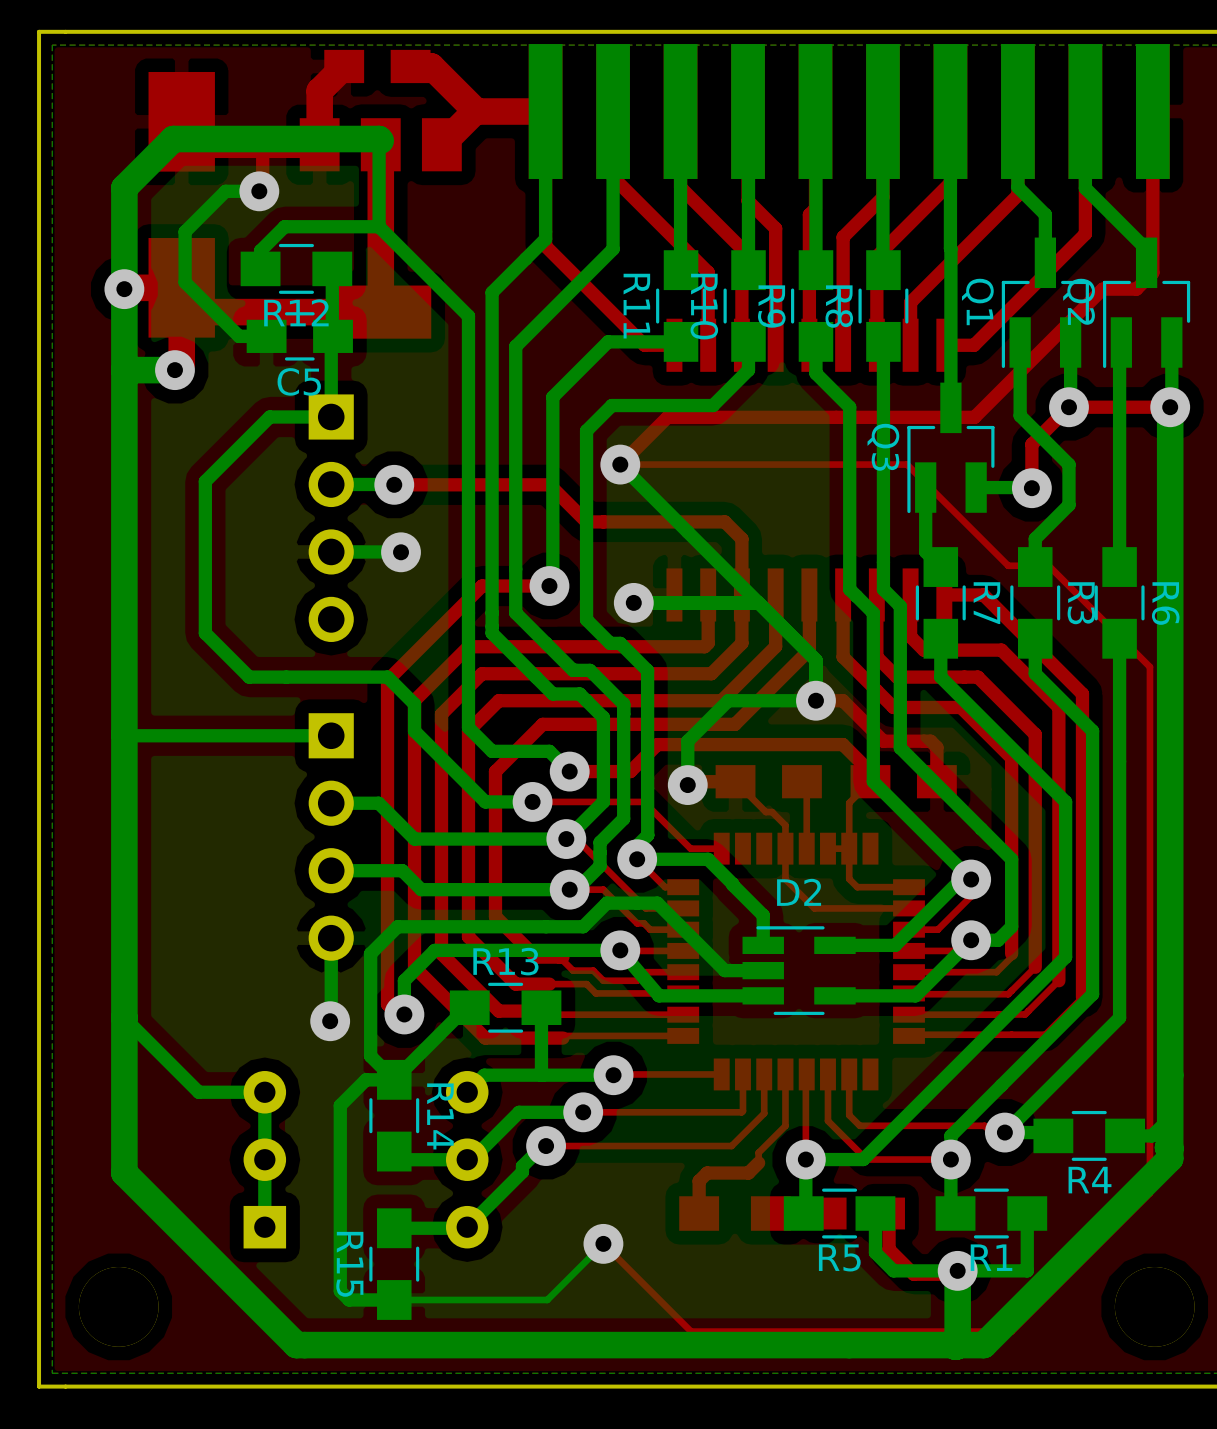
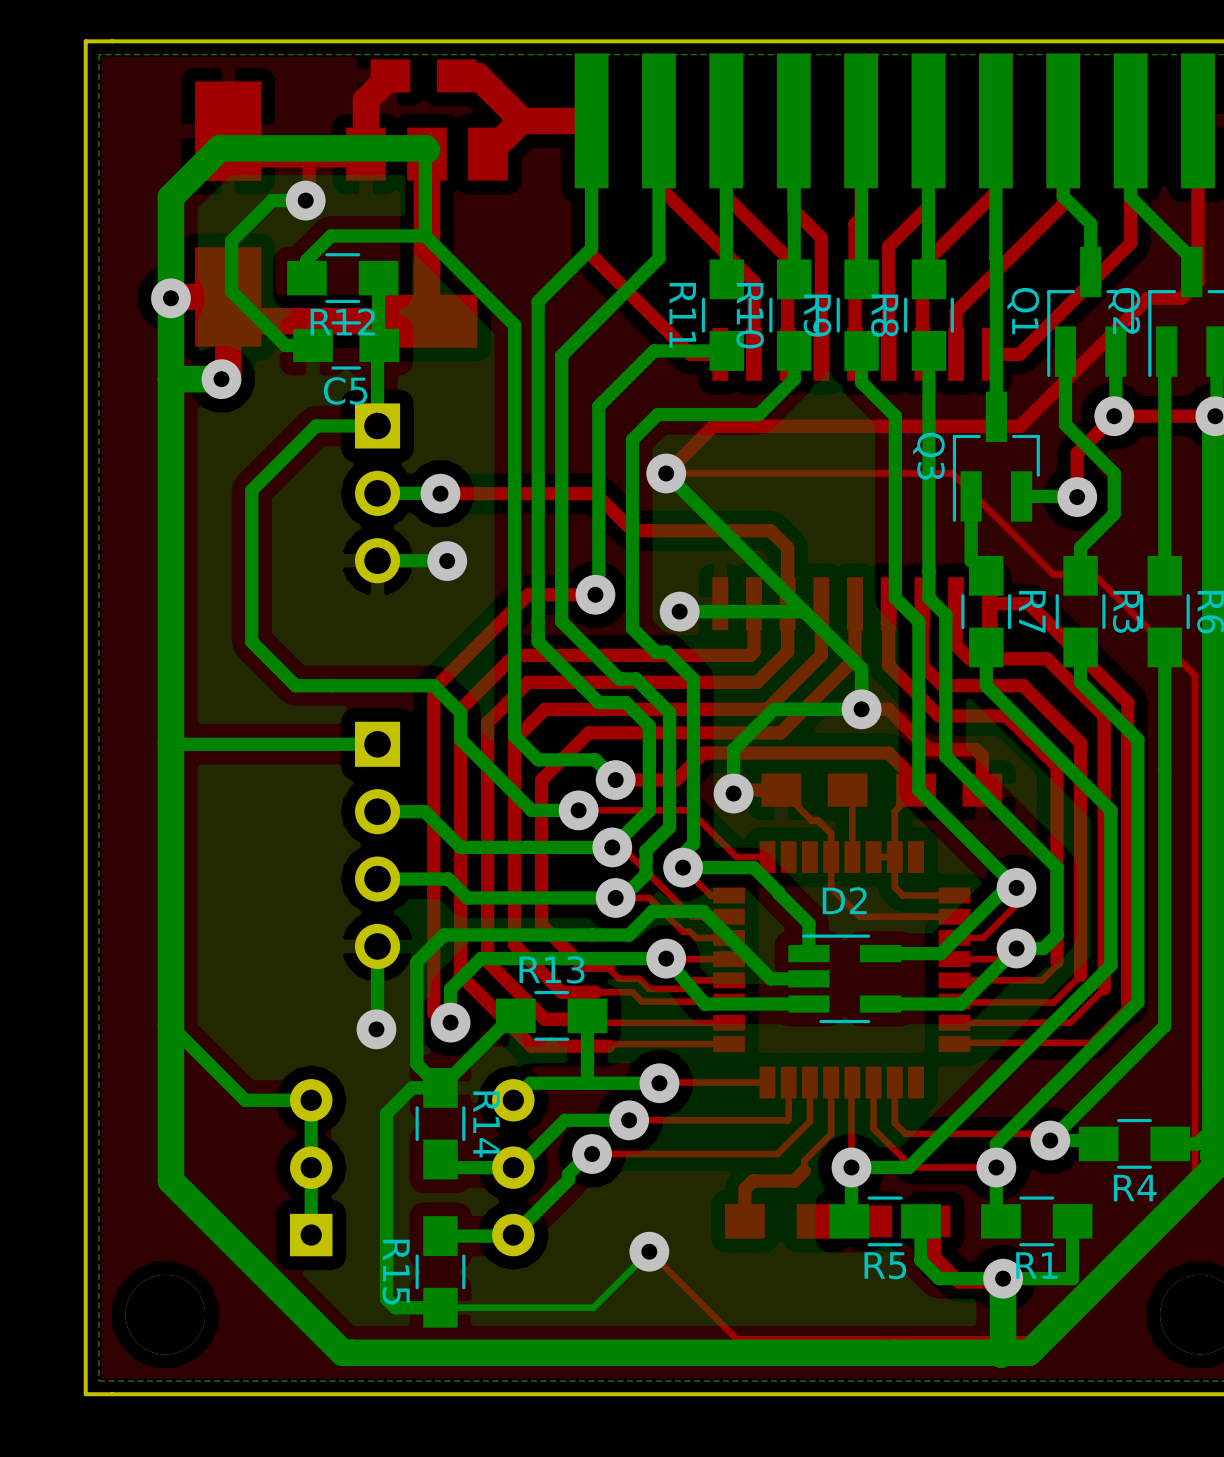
part: none -> (377, 493)
part: (331, 518) -> none

